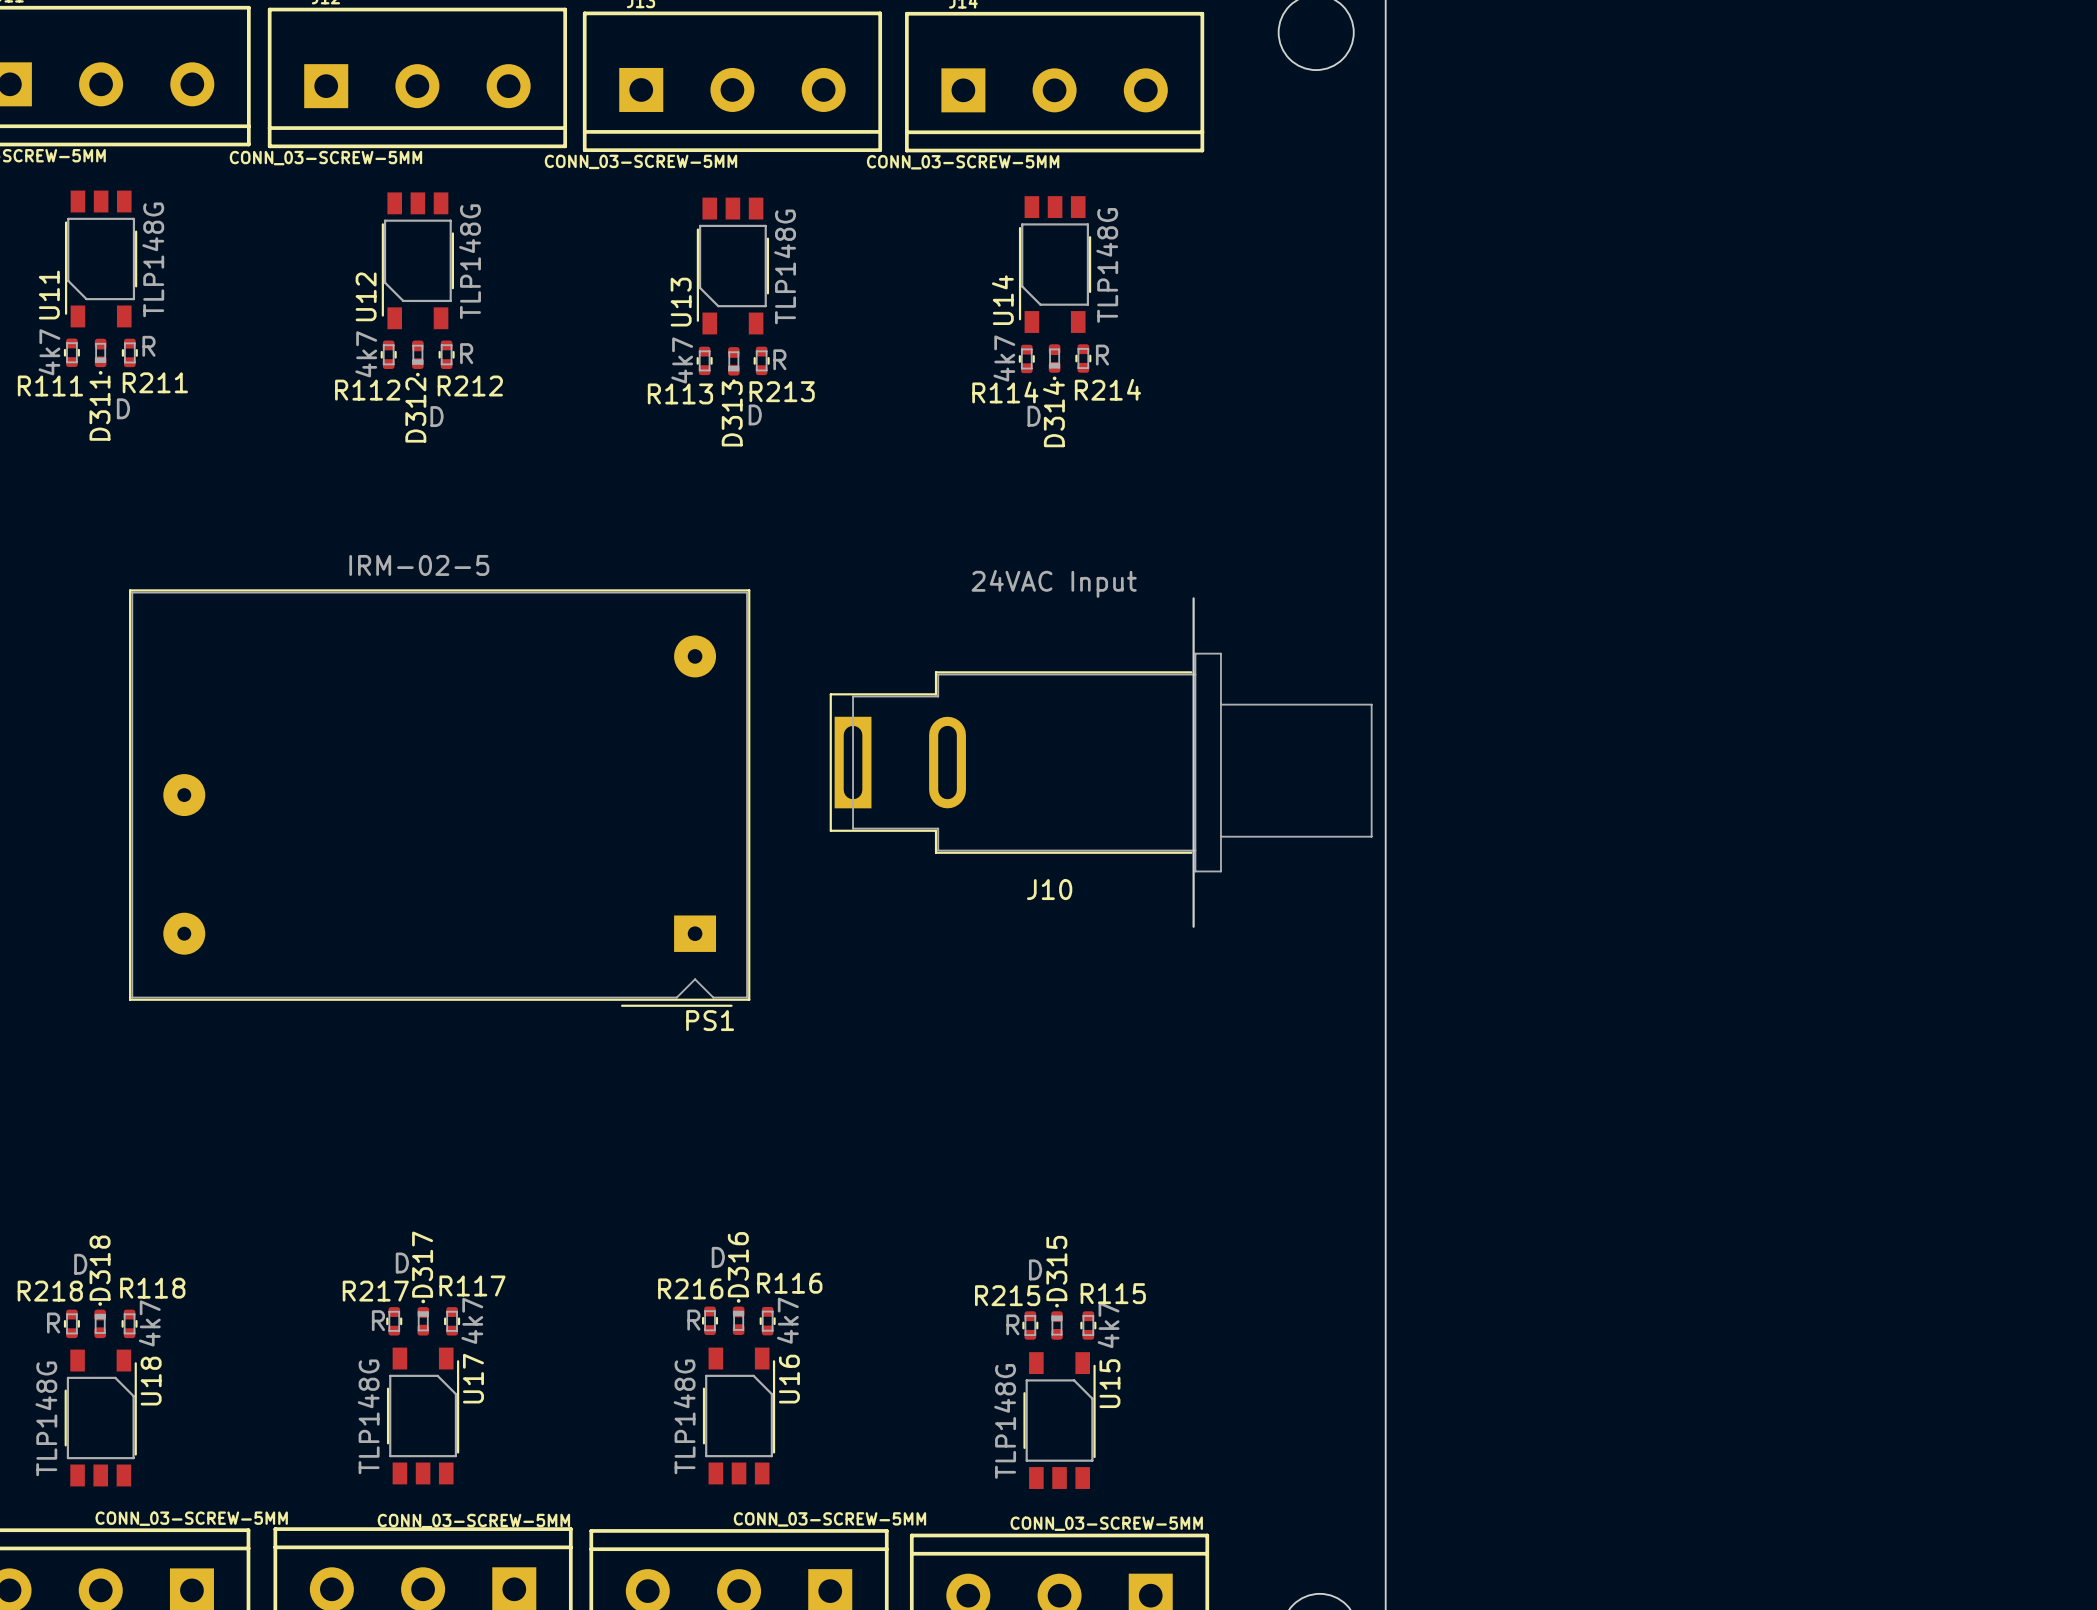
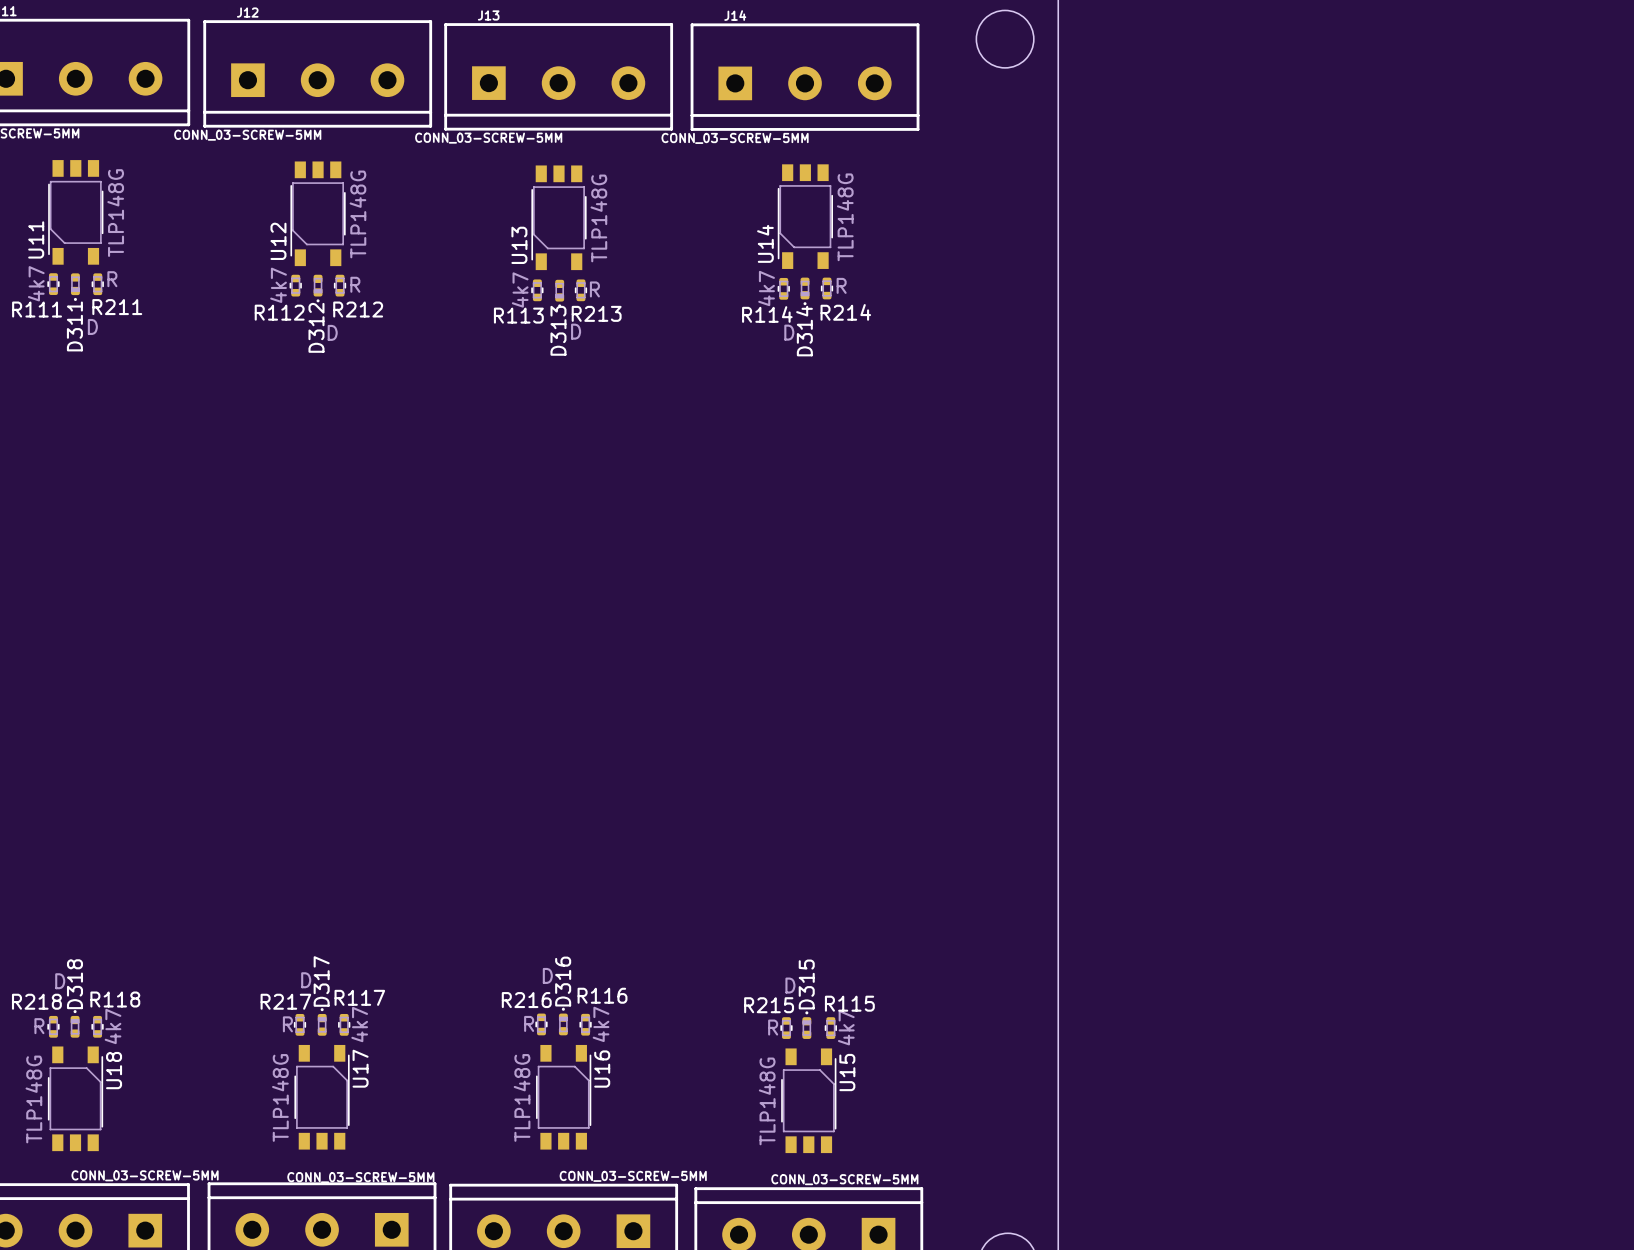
J10: 24VAC Input (1101, 762) -> none
PS1: IRM-02-5 (439, 798) -> none

